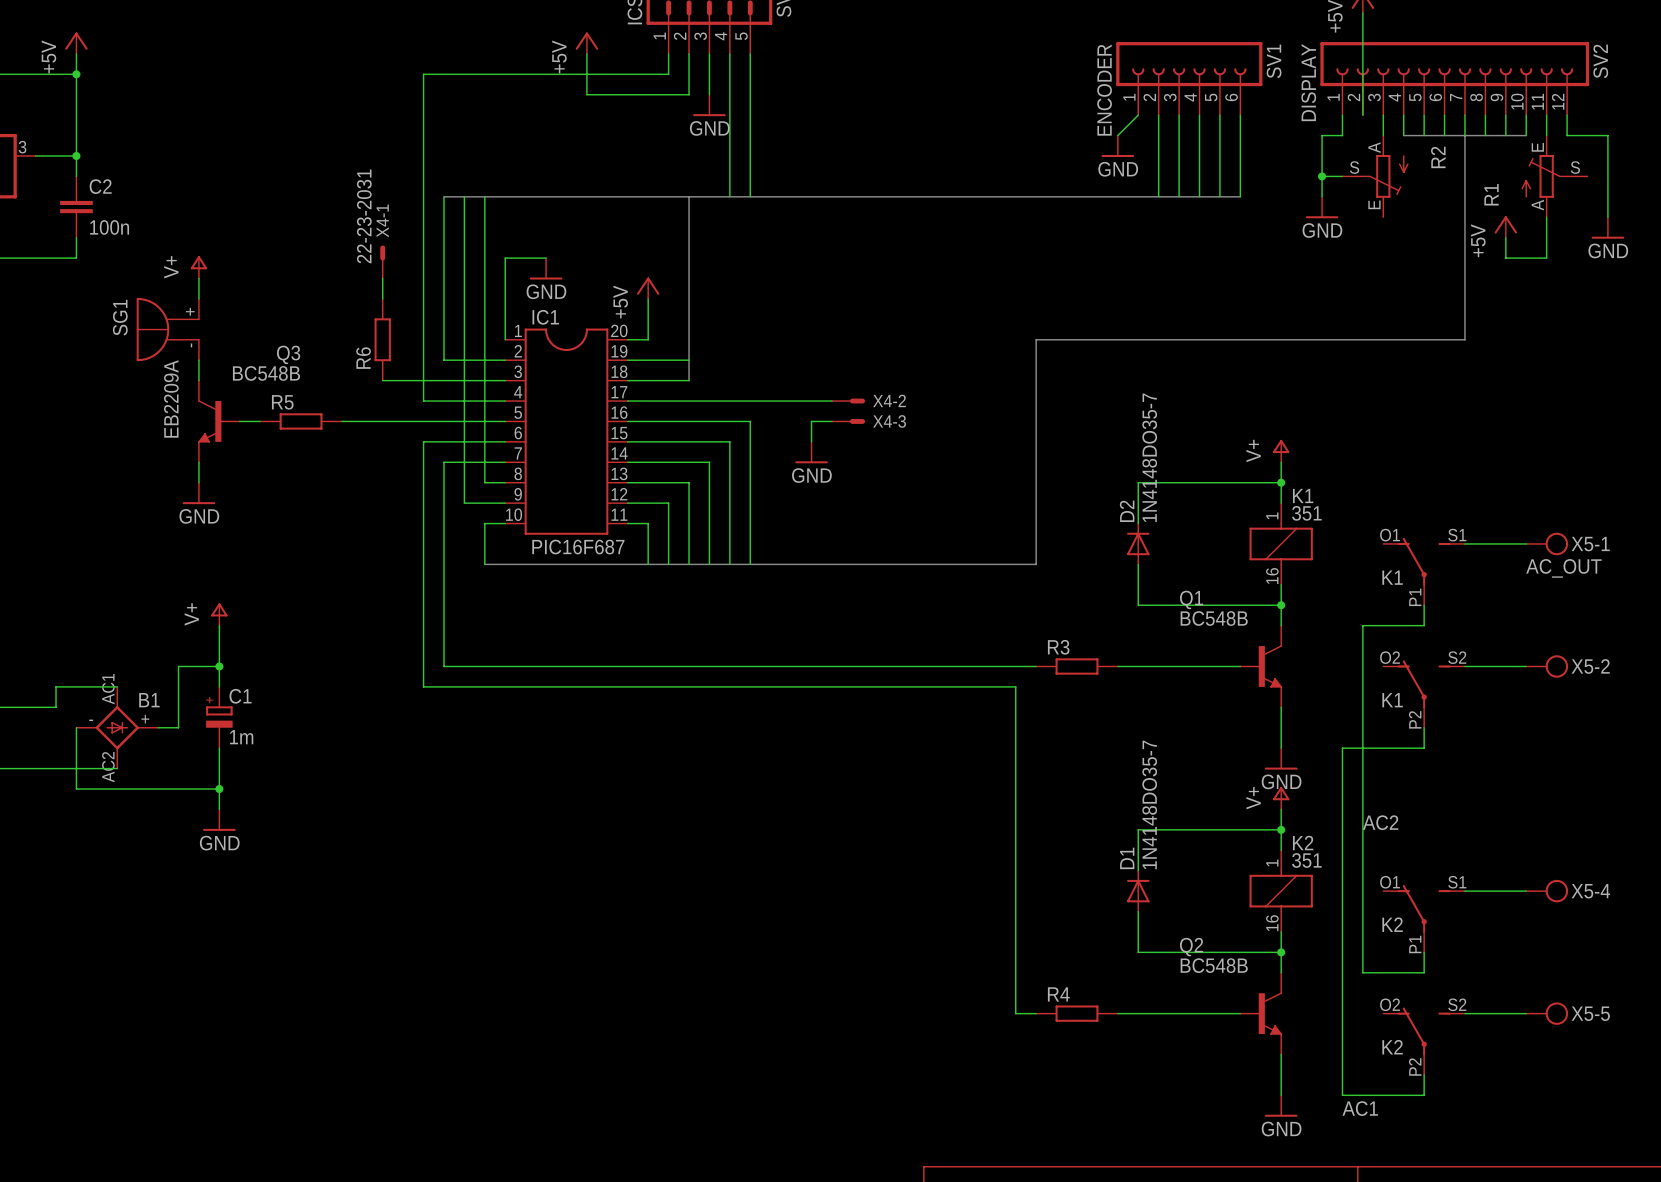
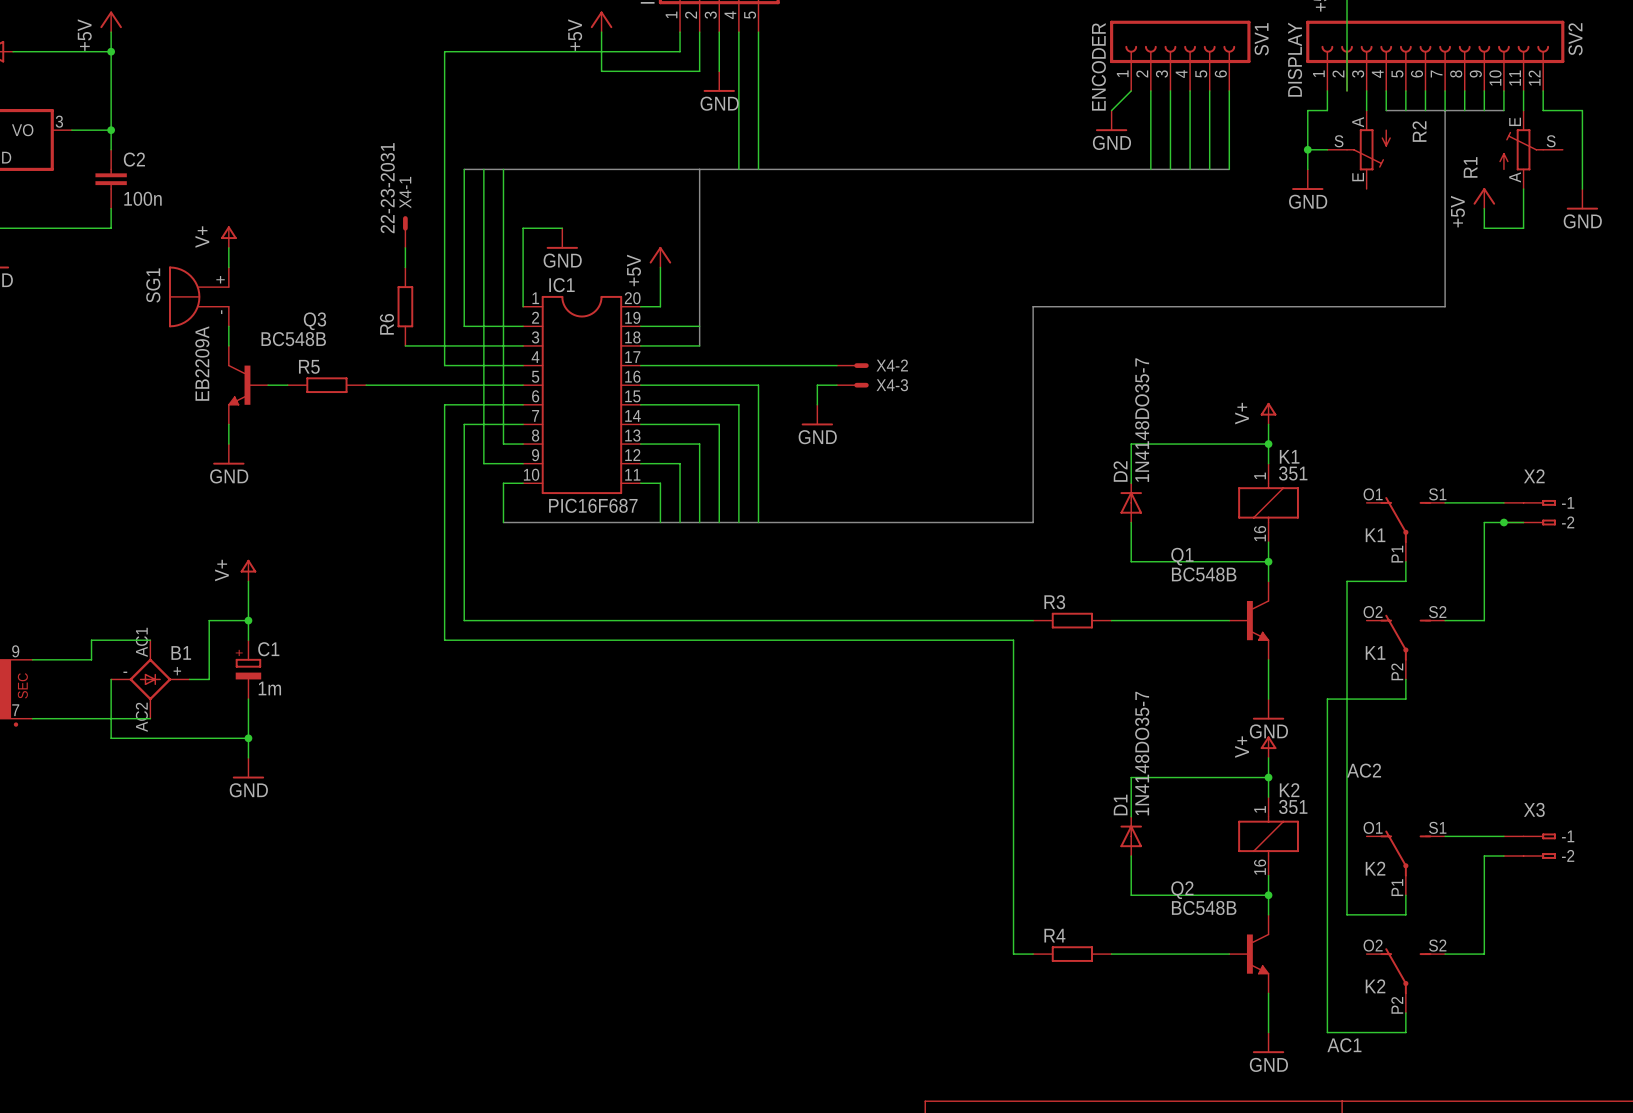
X5-1: AC_OUT (1547, 543) -> none
X2: none -> (1529, 512)
junction: none -> (1503, 522)
wire: (1505, 666) (1526, 666) -> (1484, 620) (1484, 522) (1523, 522)
X5-2: (1547, 666) -> none
X5-4: (1547, 891) -> none
X3: none -> (1529, 846)
wire: (1505, 1013) (1526, 1013) -> (1484, 954) (1484, 856) (1503, 856)
X5-5: (1547, 1013) -> none

